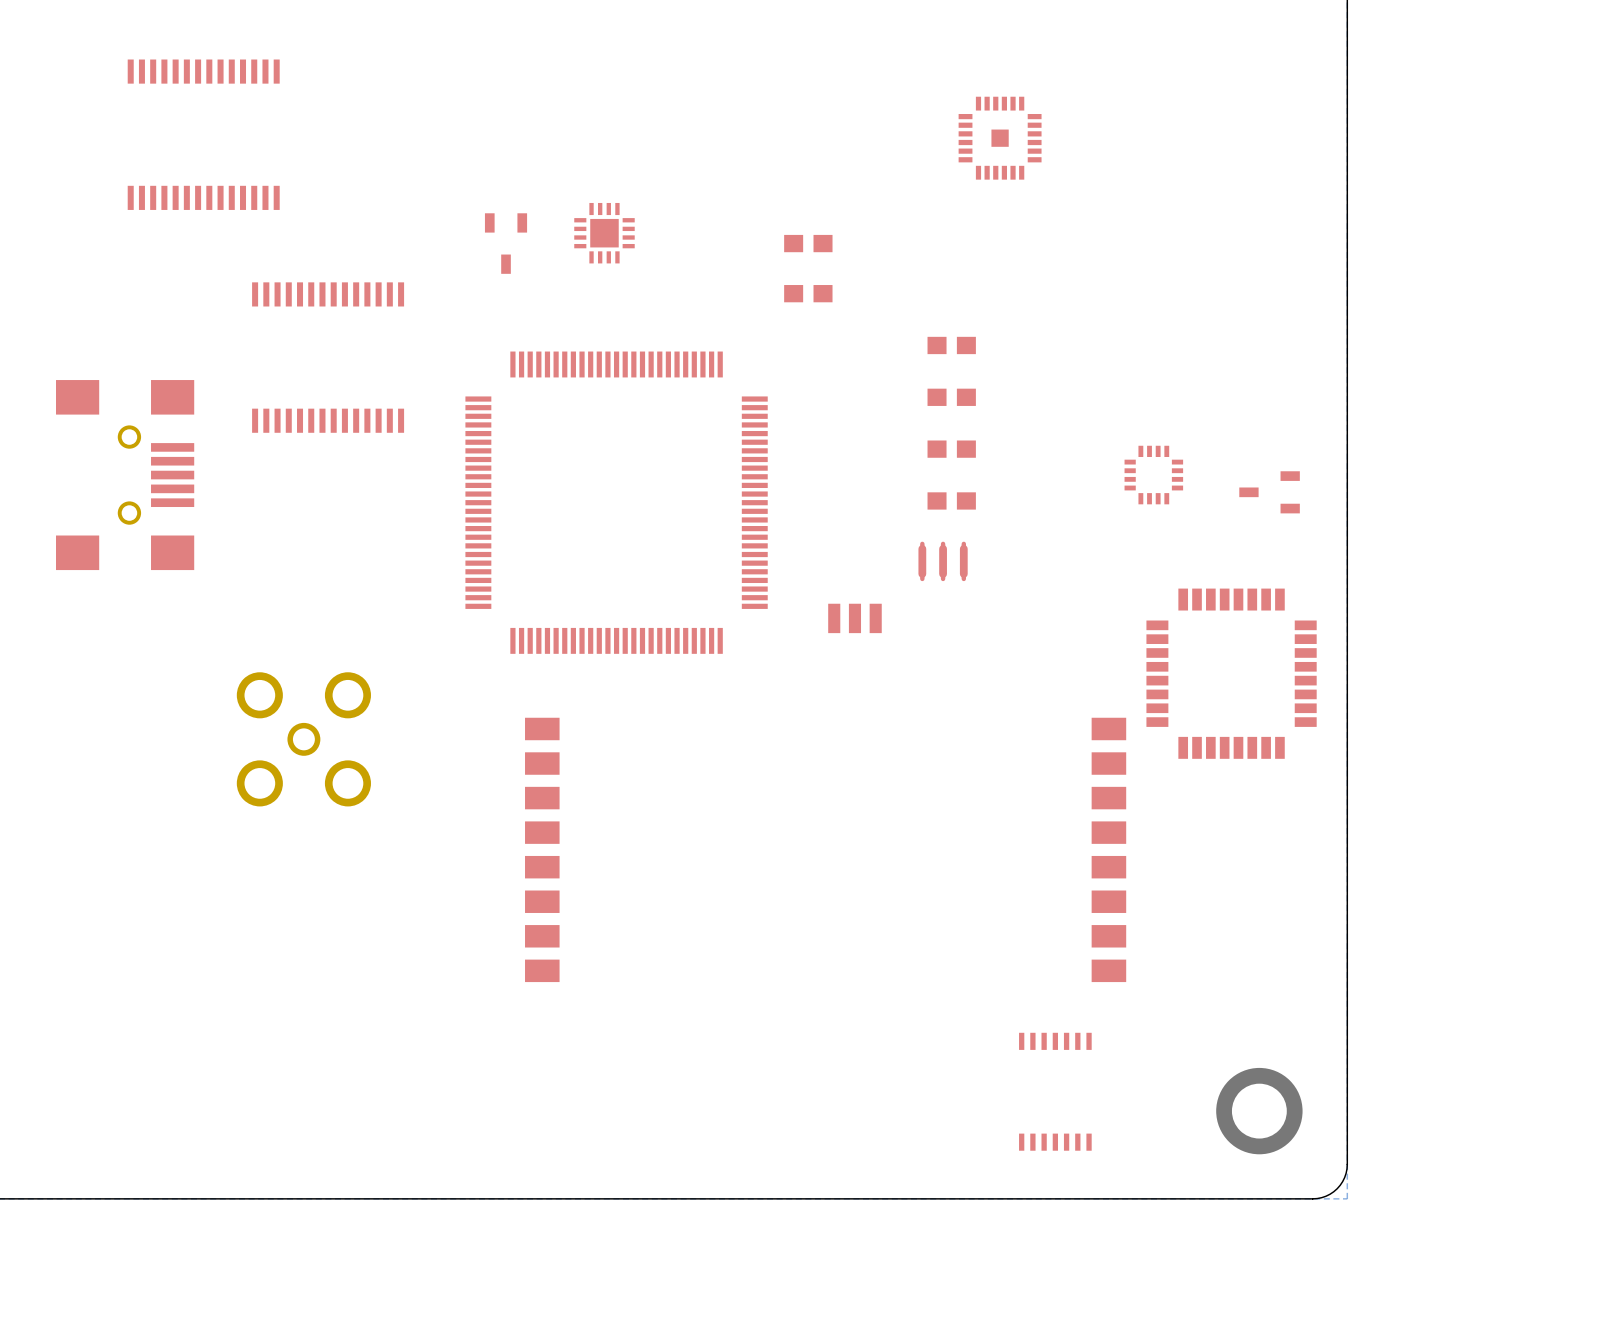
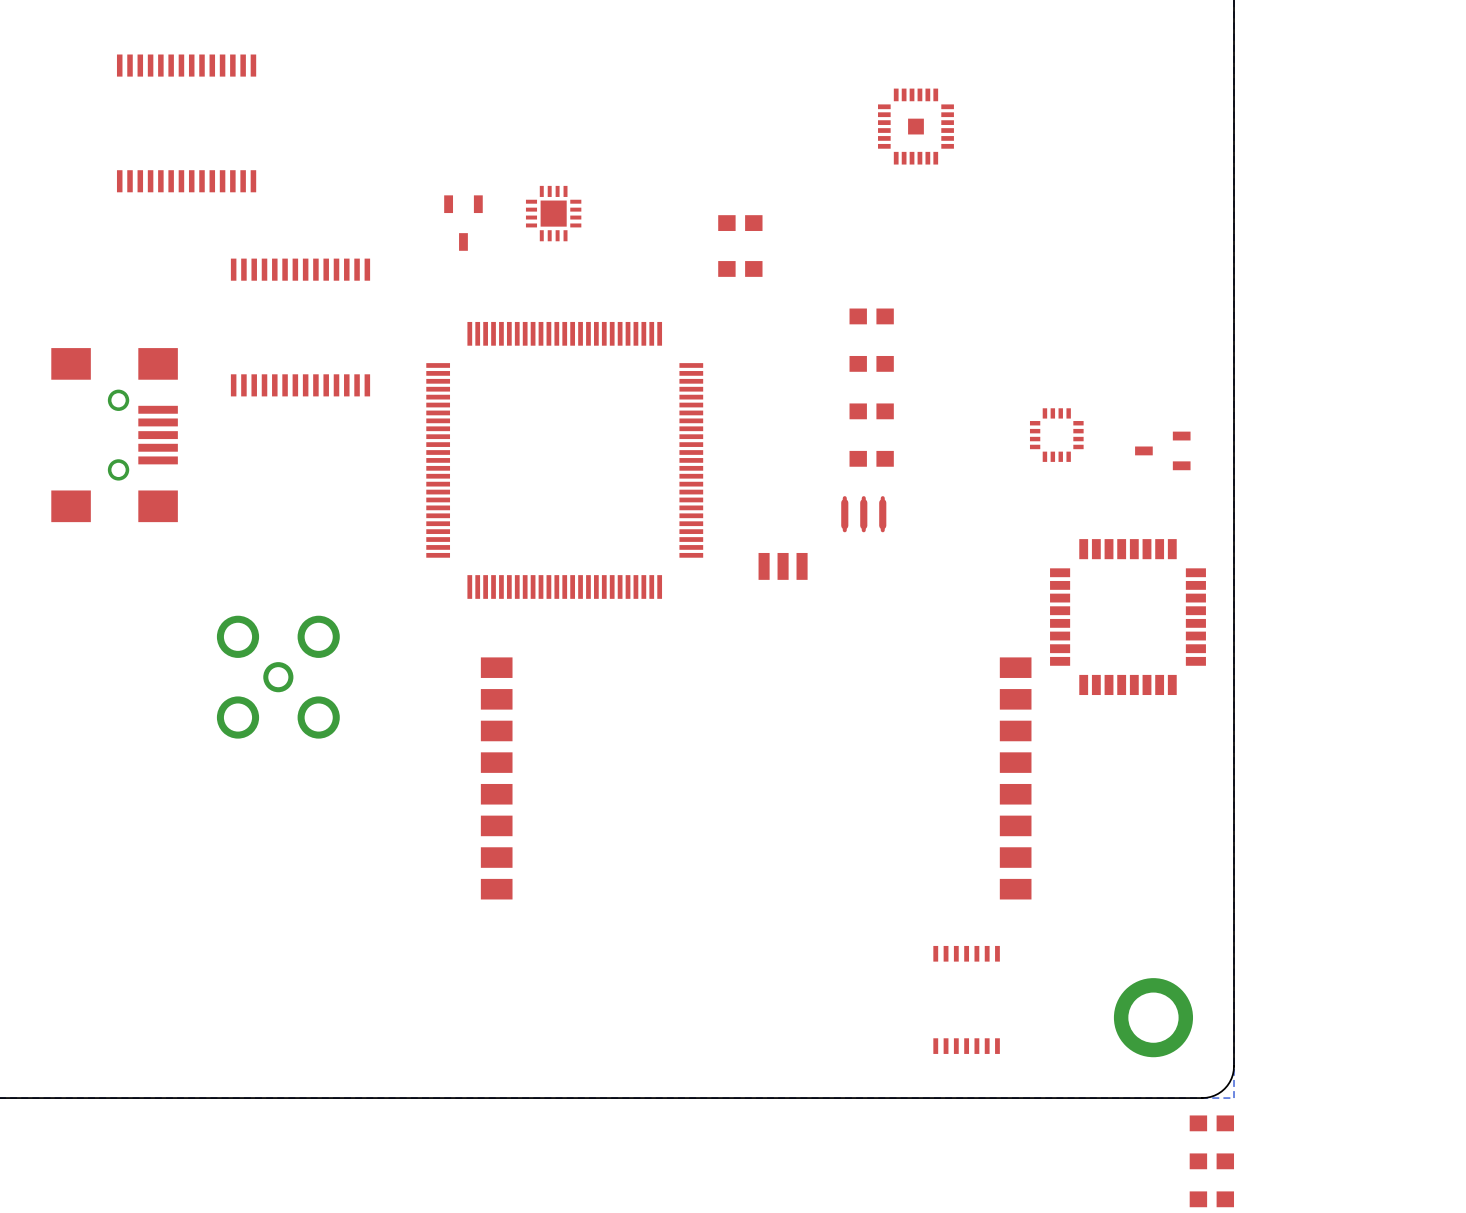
part: none -> (1211, 1123)
part: none -> (1211, 1161)
part: none -> (1211, 1199)

